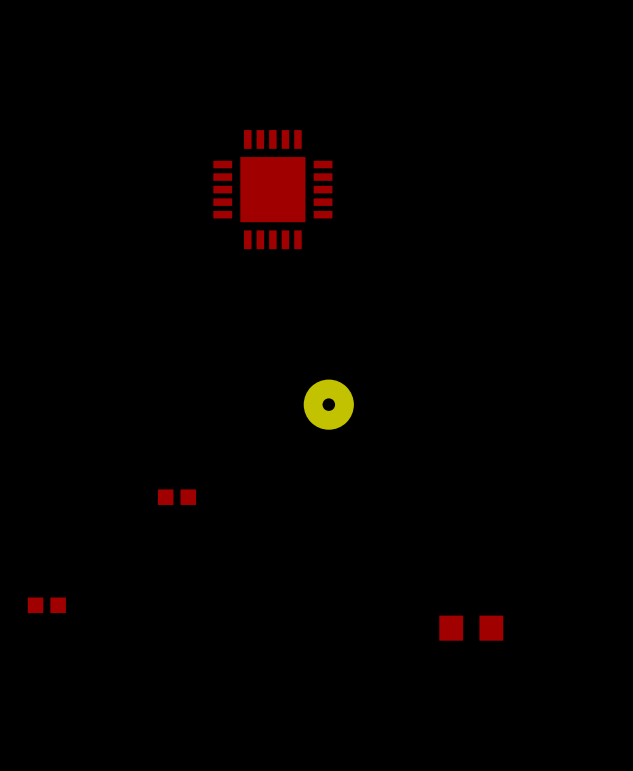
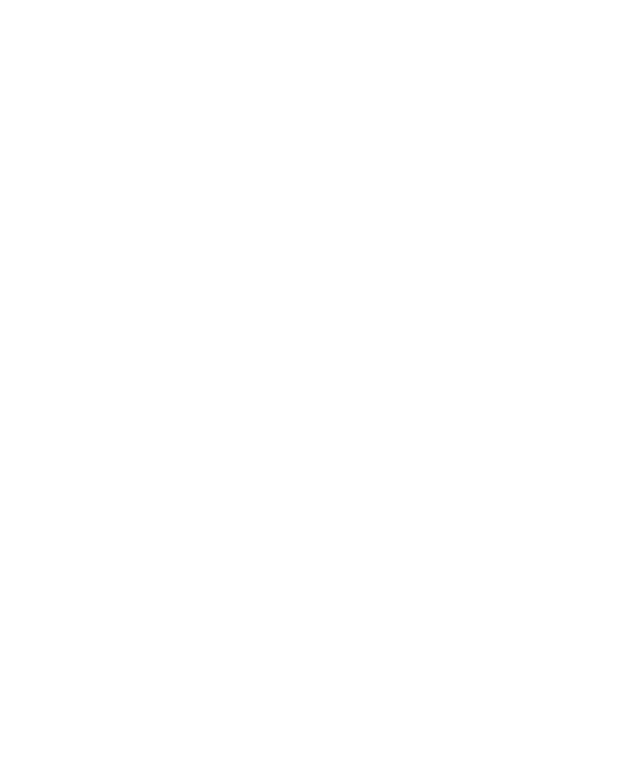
part: (272, 189) -> none
part: (328, 404) -> none
part: (176, 497) -> none
part: (46, 605) -> none
part: (471, 628) -> none

